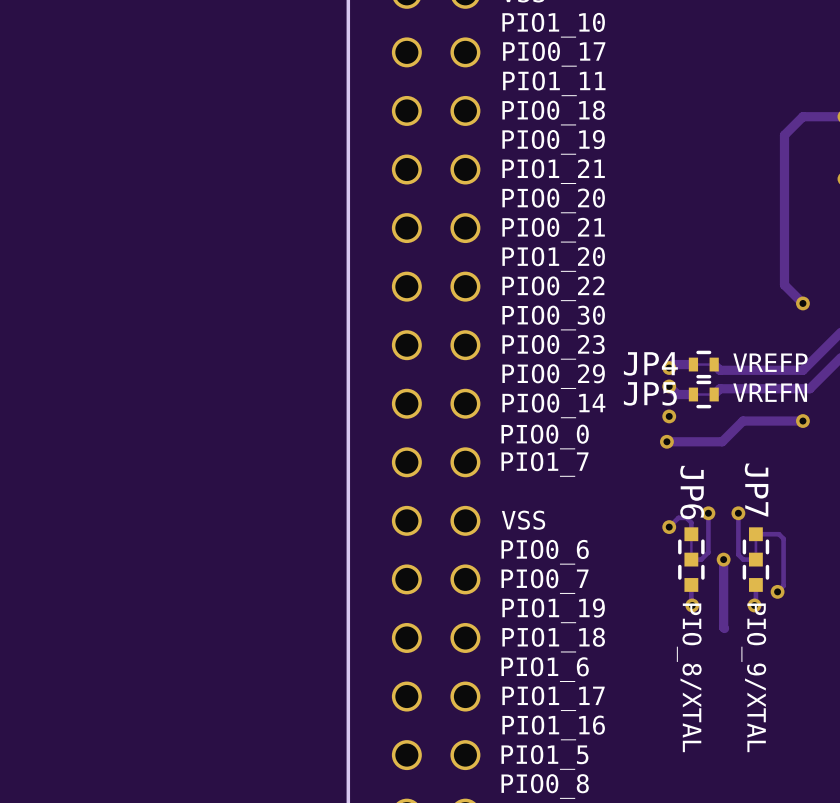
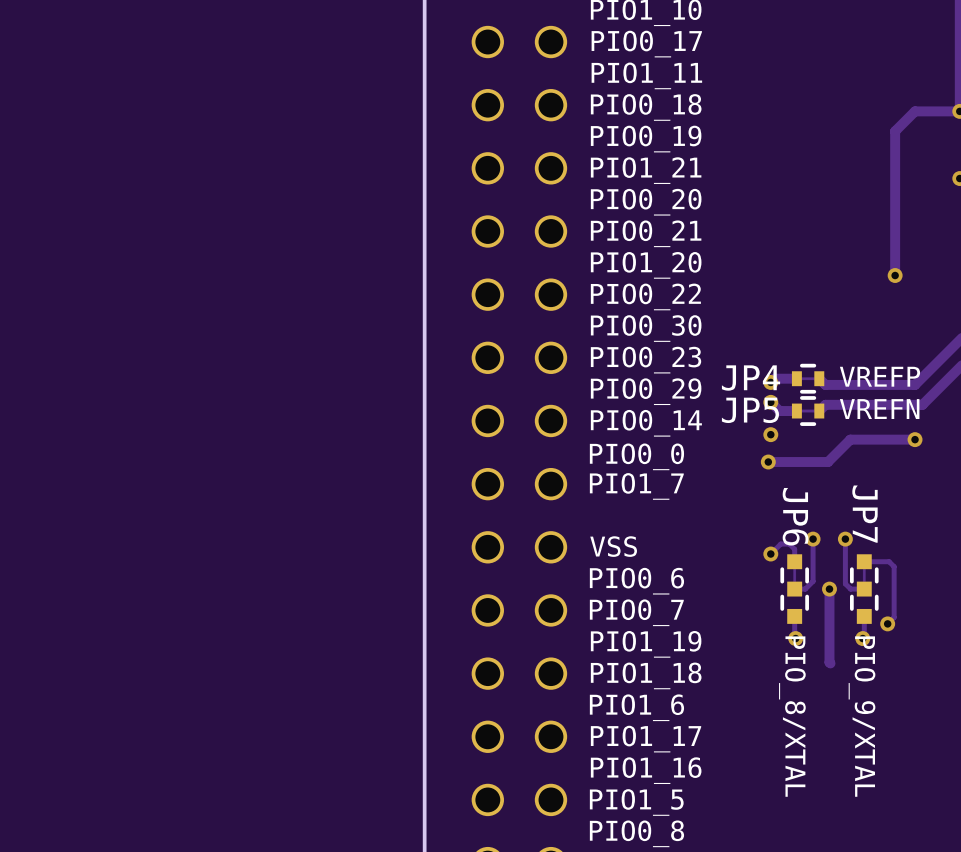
track: (784, 268) (784, 285) (802, 303) -> none
via position: (802, 303) -> (895, 275)

